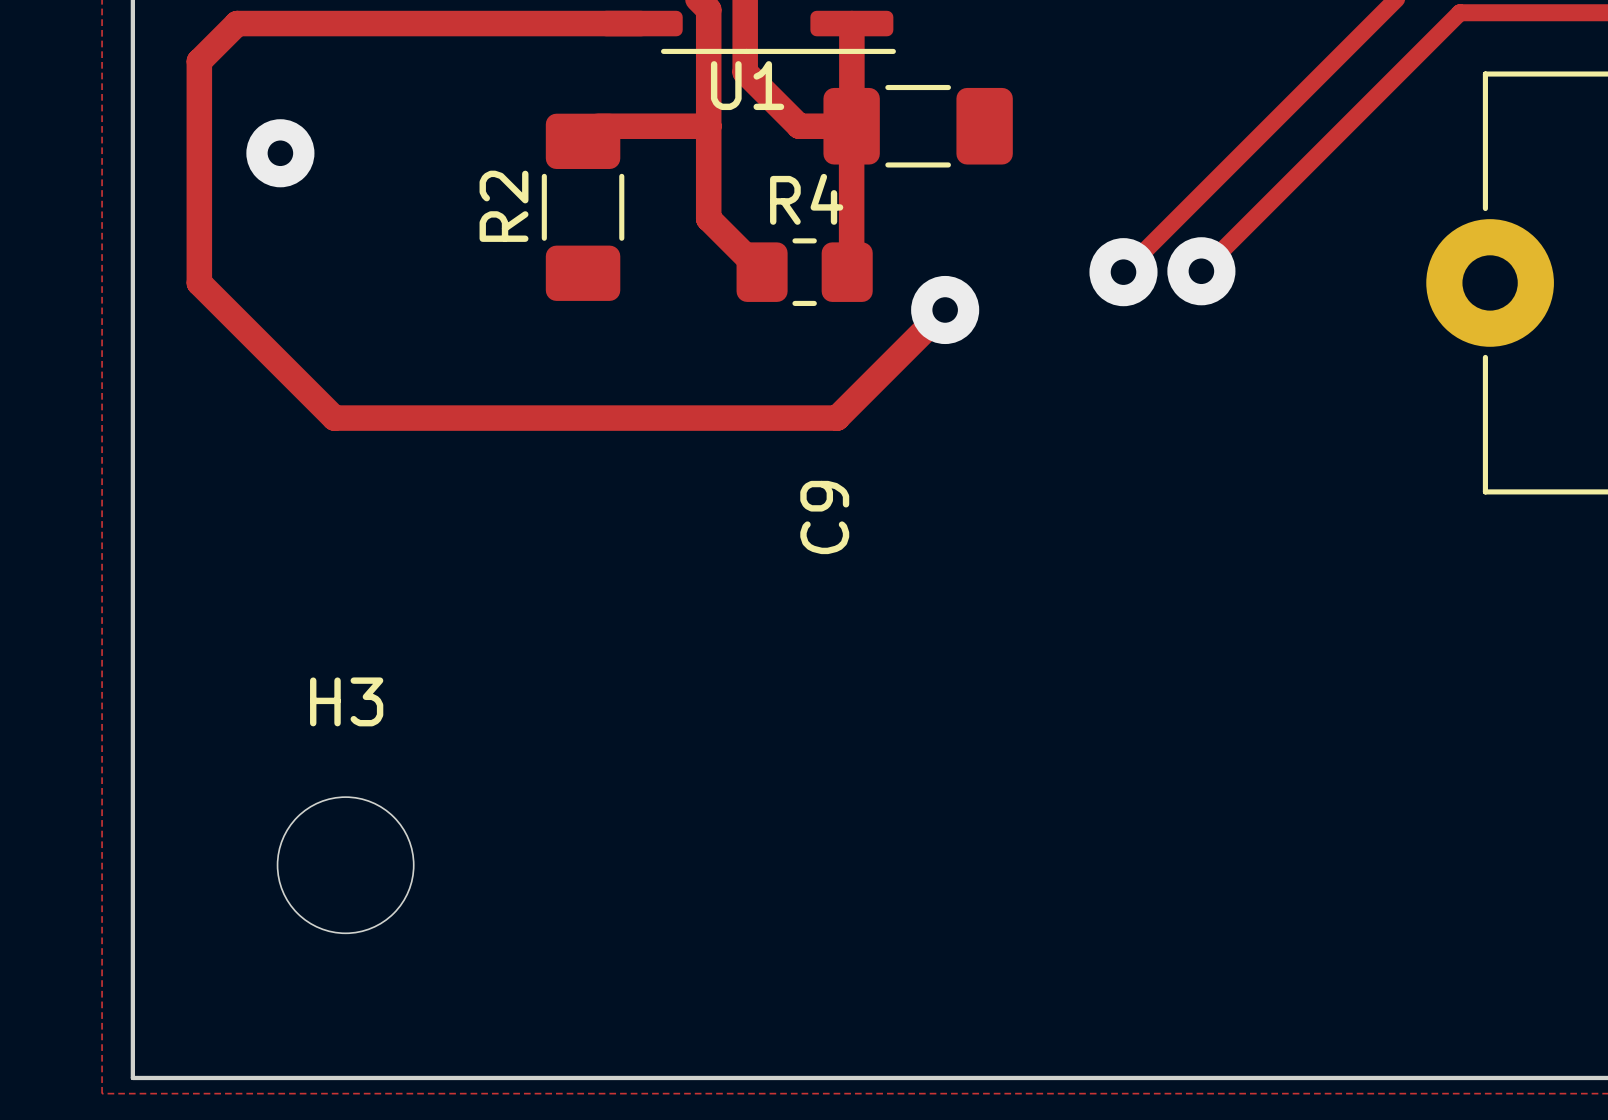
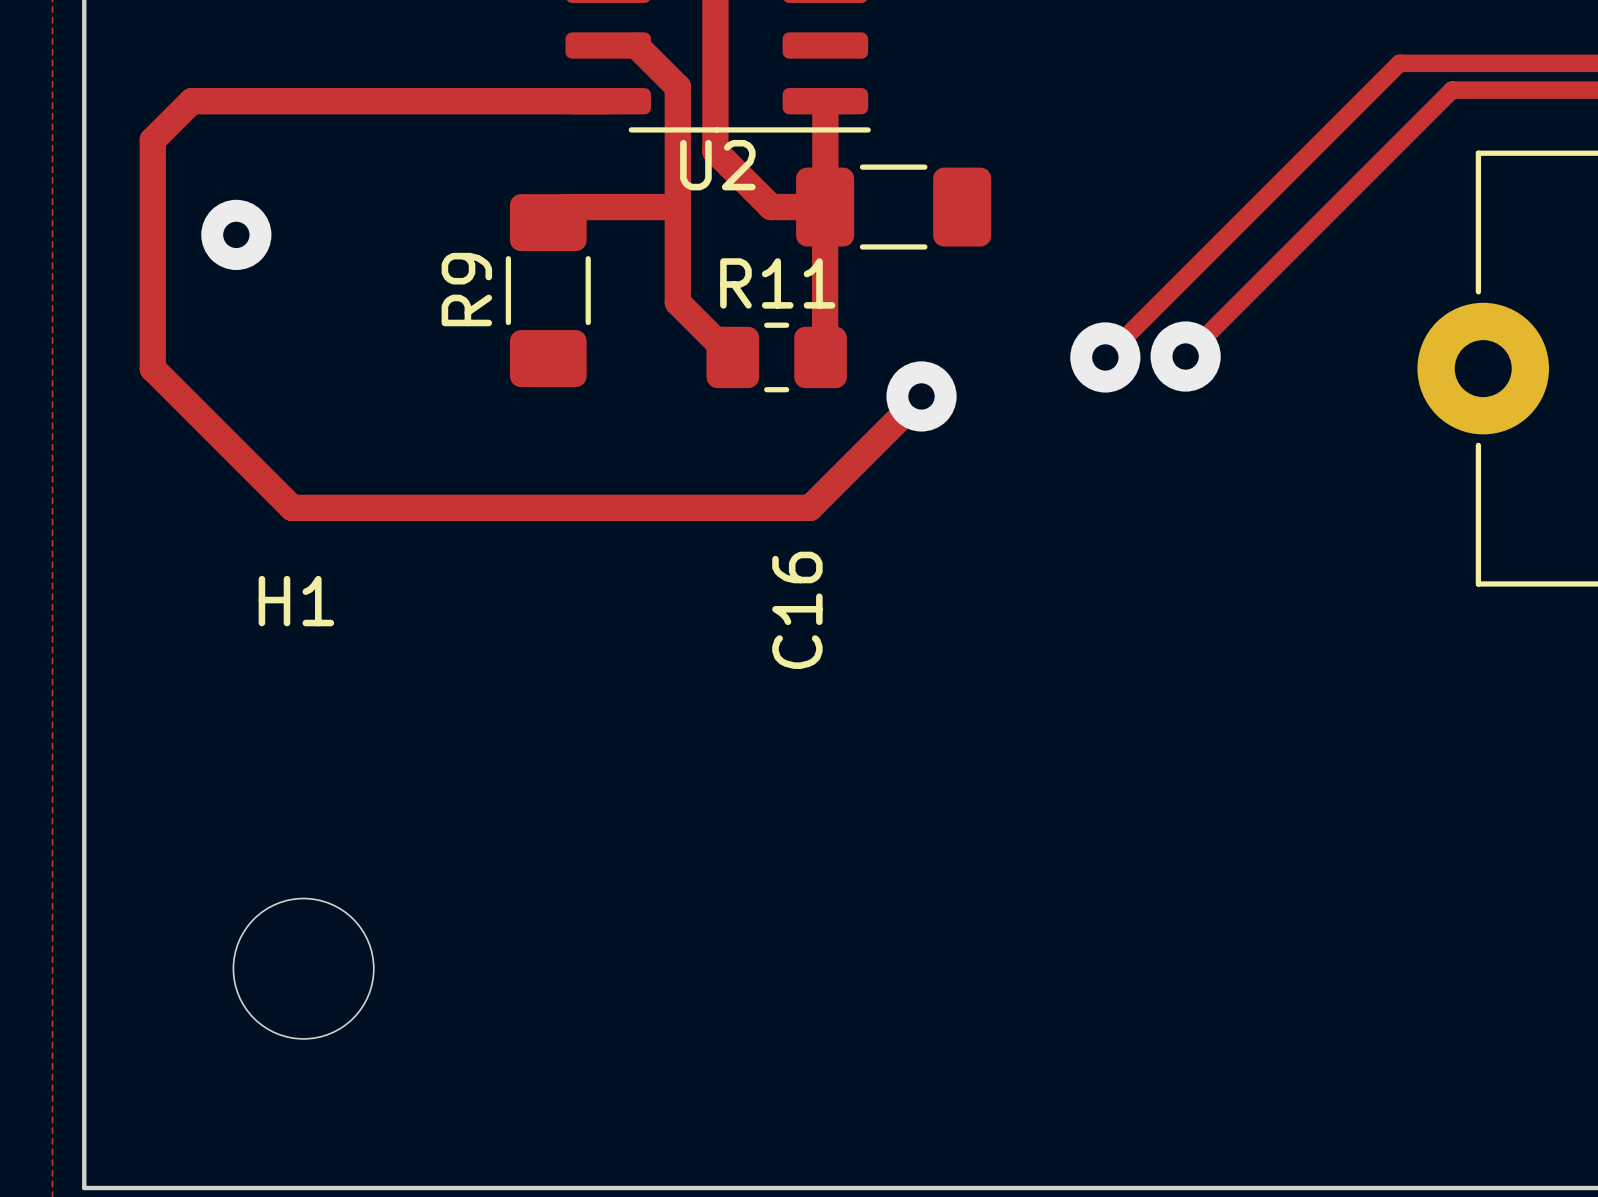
U1 name: U1 (747, 85) -> U2 (717, 165)
R4 name: R4 (806, 199) -> R11 (777, 283)
R2 name: R2 (504, 206) -> R9 (466, 289)
C9 name: C9 (824, 517) -> C16 (797, 610)
H3 name: H3 (346, 701) -> H1 (296, 601)

